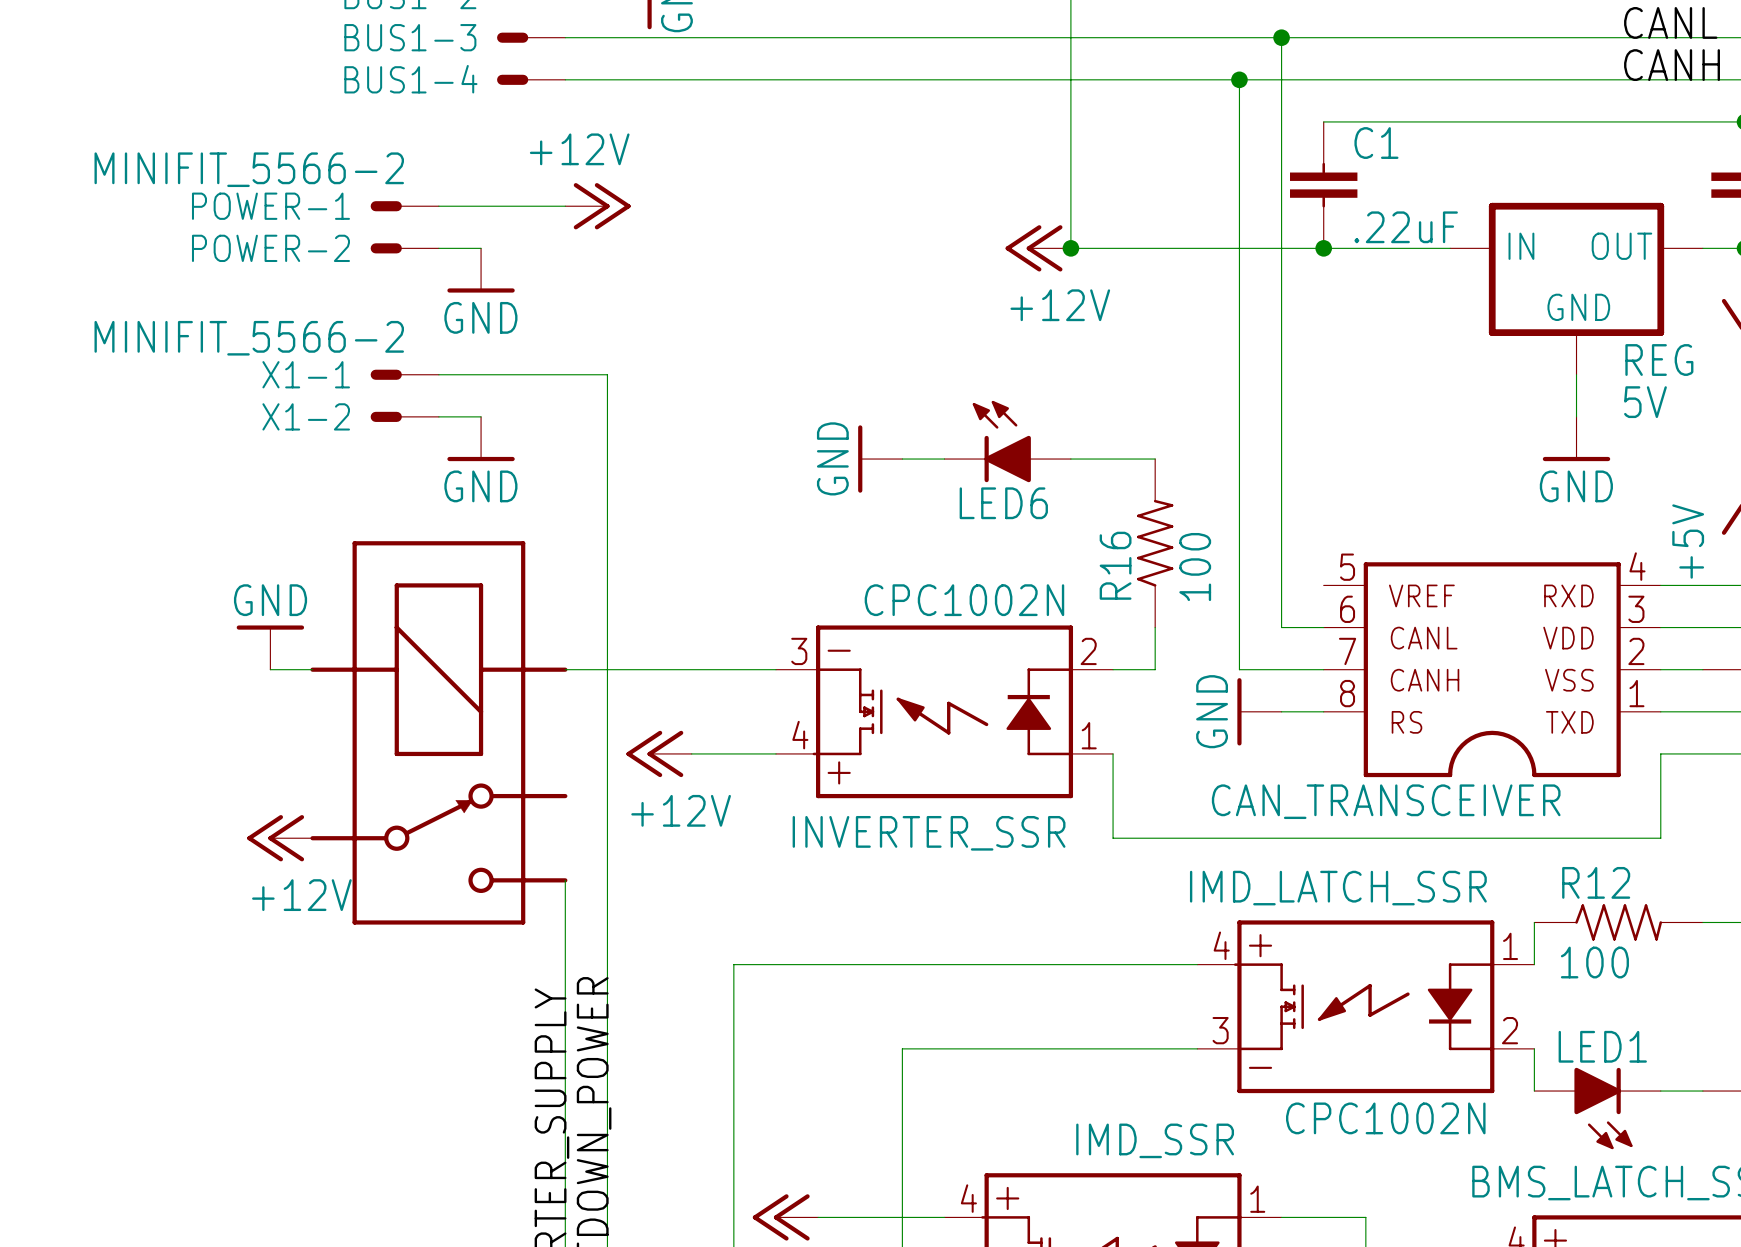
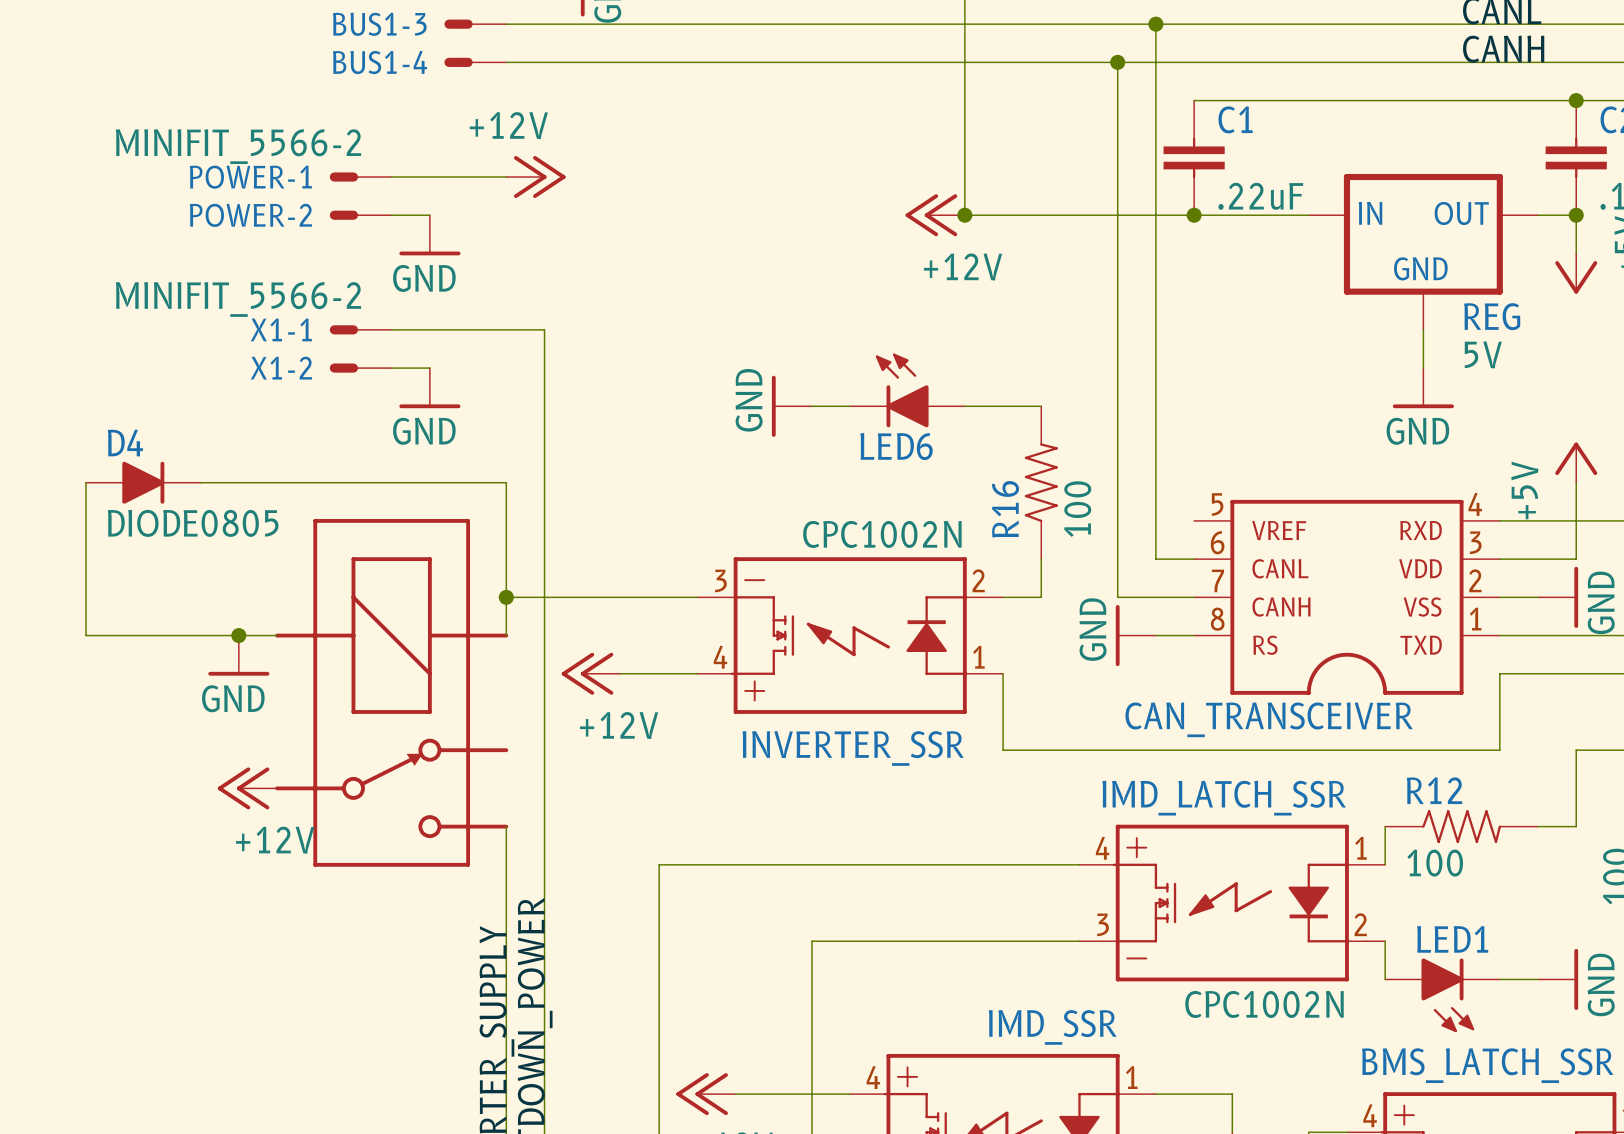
wire: none -> (85, 482) (85, 635) (277, 635)
D4: none -> DIODE0805 (143, 482)
wire: none -> (200, 482) (506, 482) (506, 635)
power symbol rotation: 0° (270, 627) -> 180° (238, 673)
power symbol position: GND (270, 647) -> GND (238, 655)
wire: (270, 669) (312, 669) -> none
junction: none -> (506, 597)
junction: none -> (238, 635)
part position: (438, 732) -> (391, 692)
power symbol position: +12V (279, 838) -> +12V (247, 788)
wire: (565, 880) (565, 922) -> none

